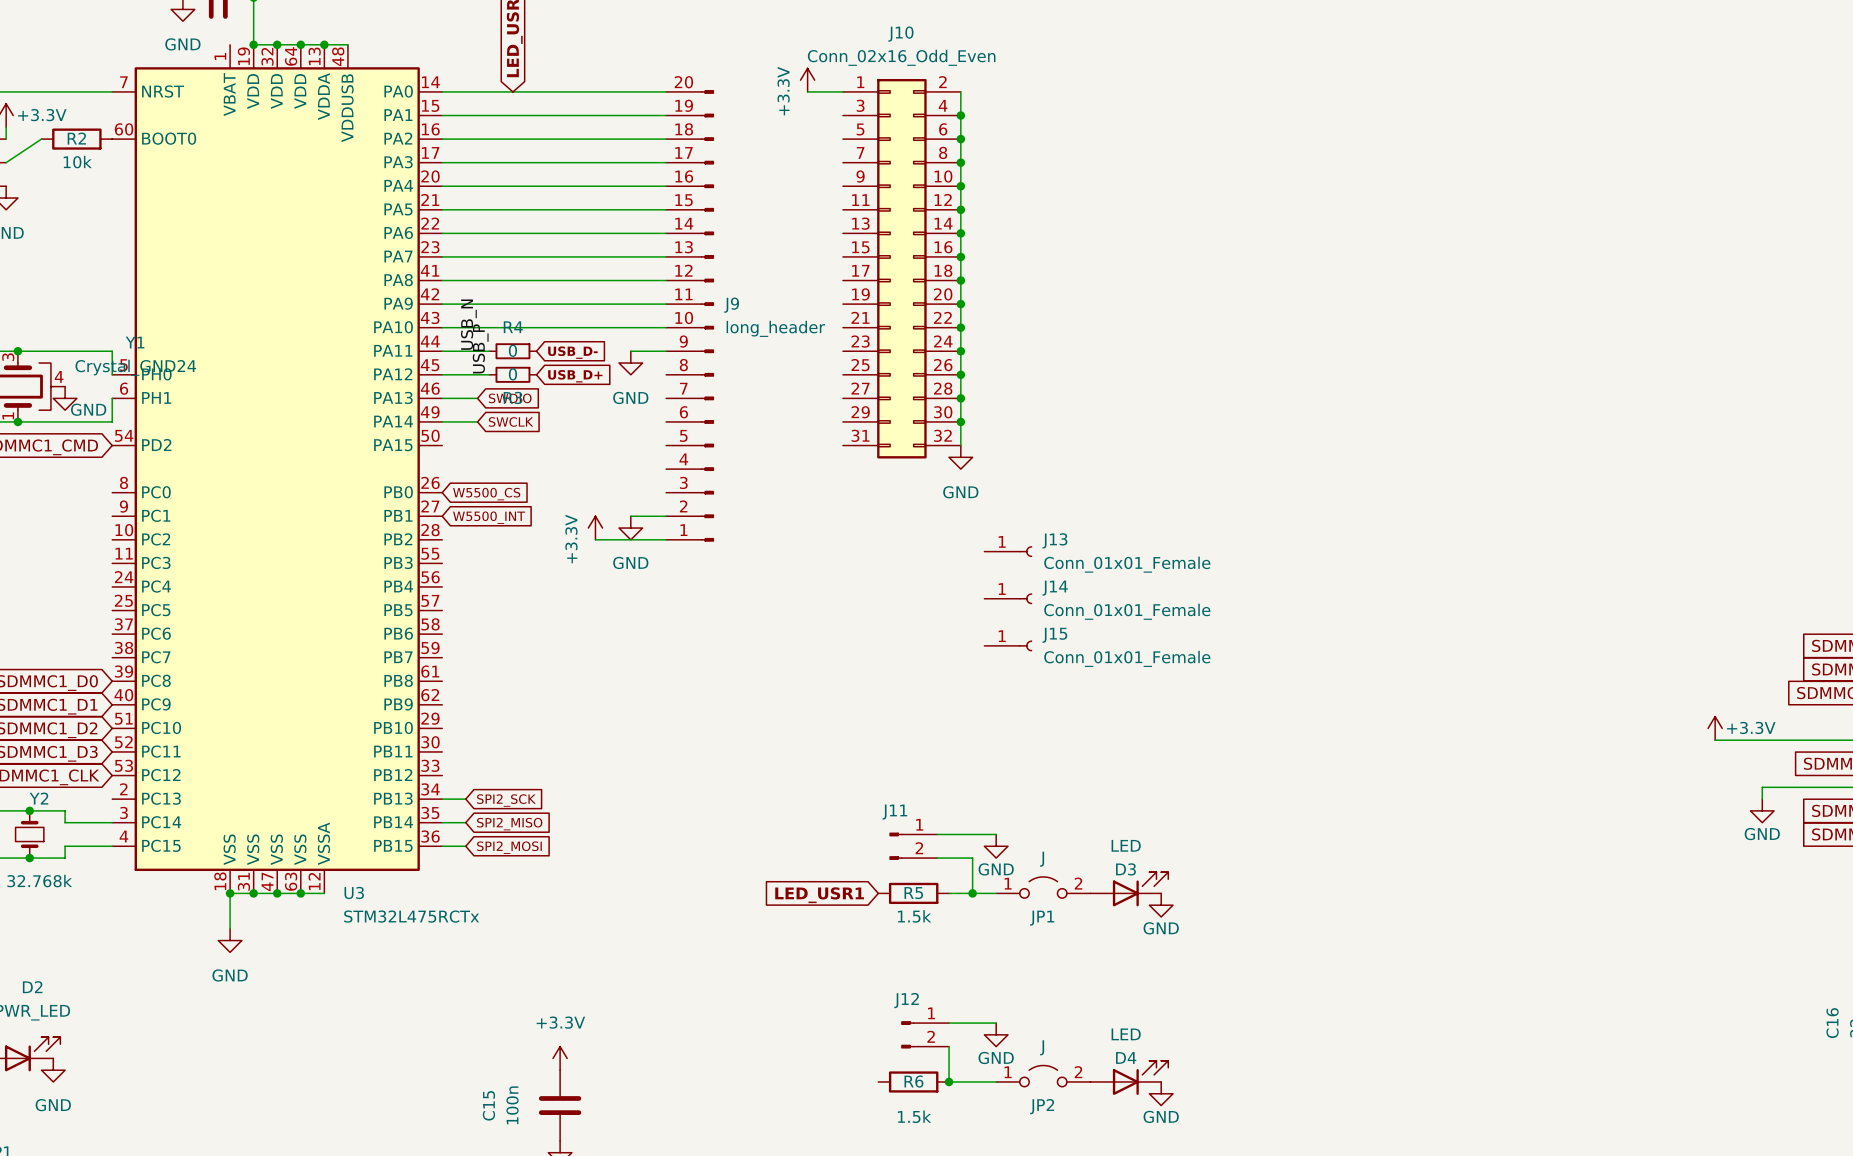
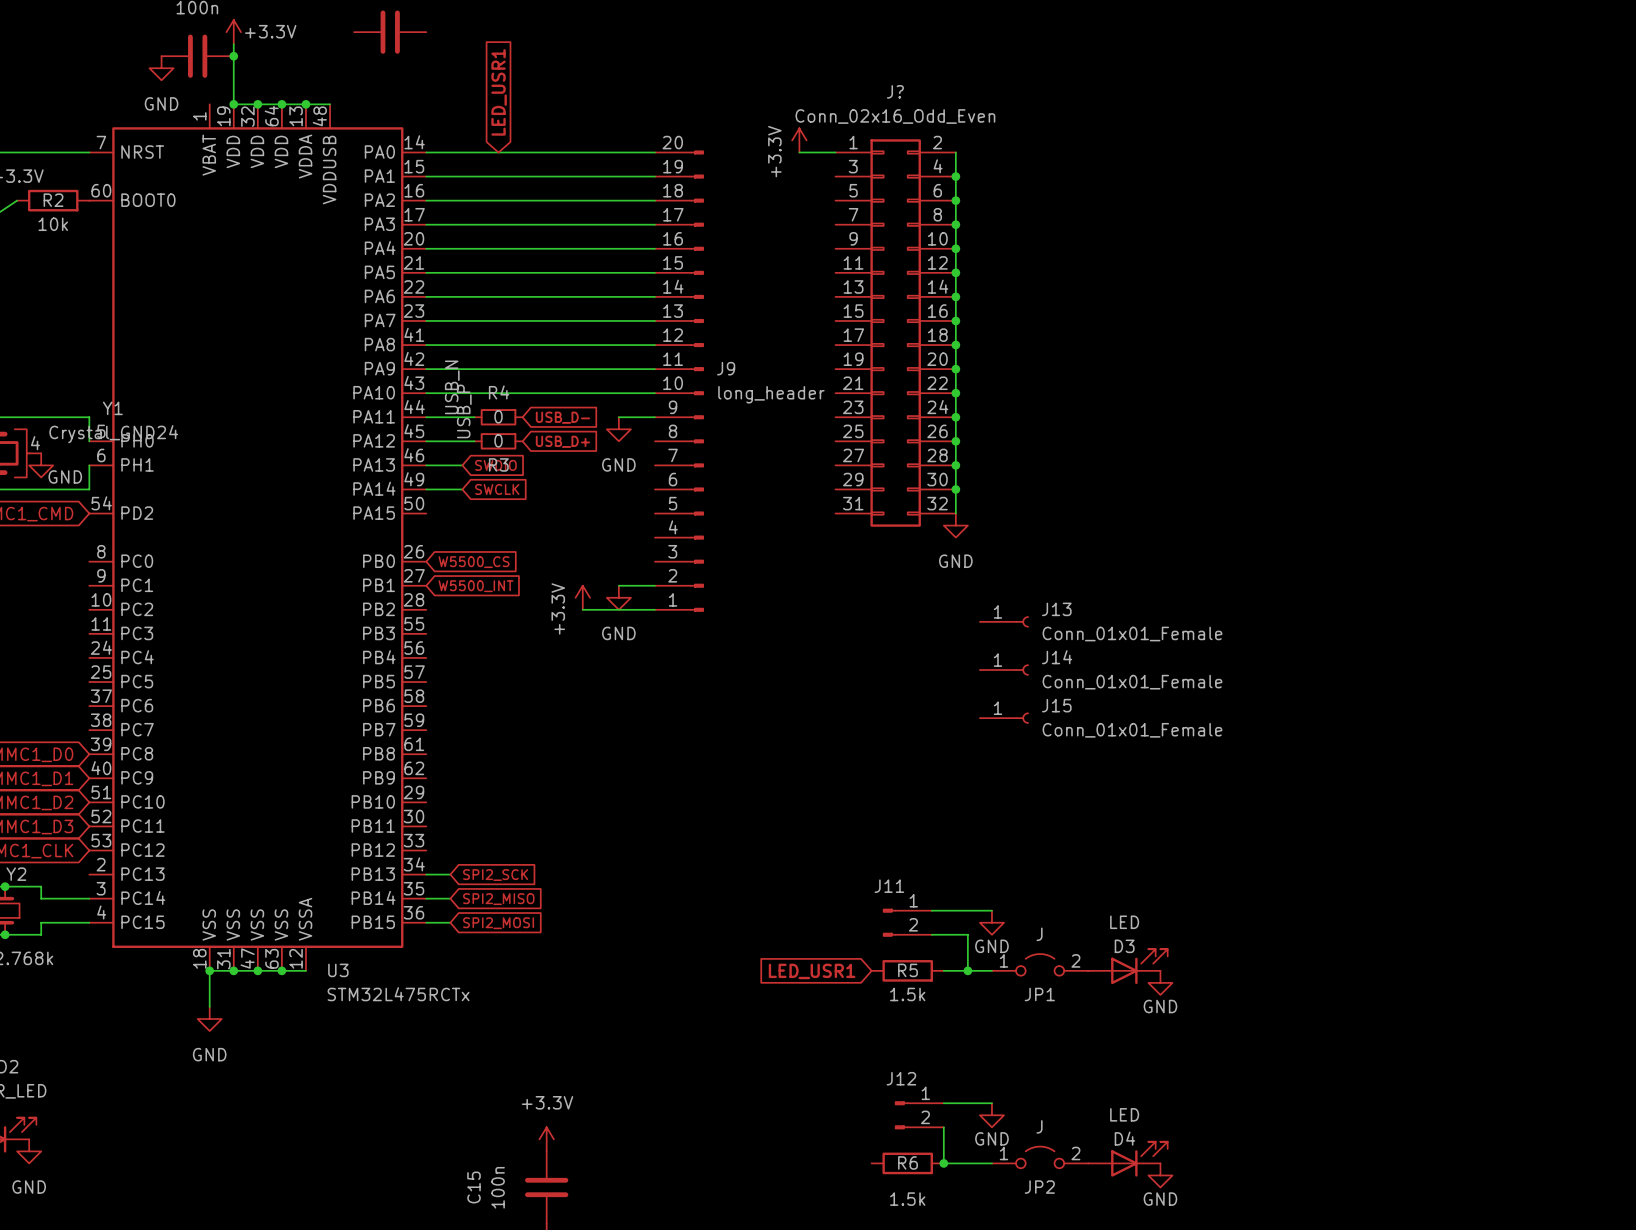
J10 name: J10 (900, 34) -> J? (895, 91)

